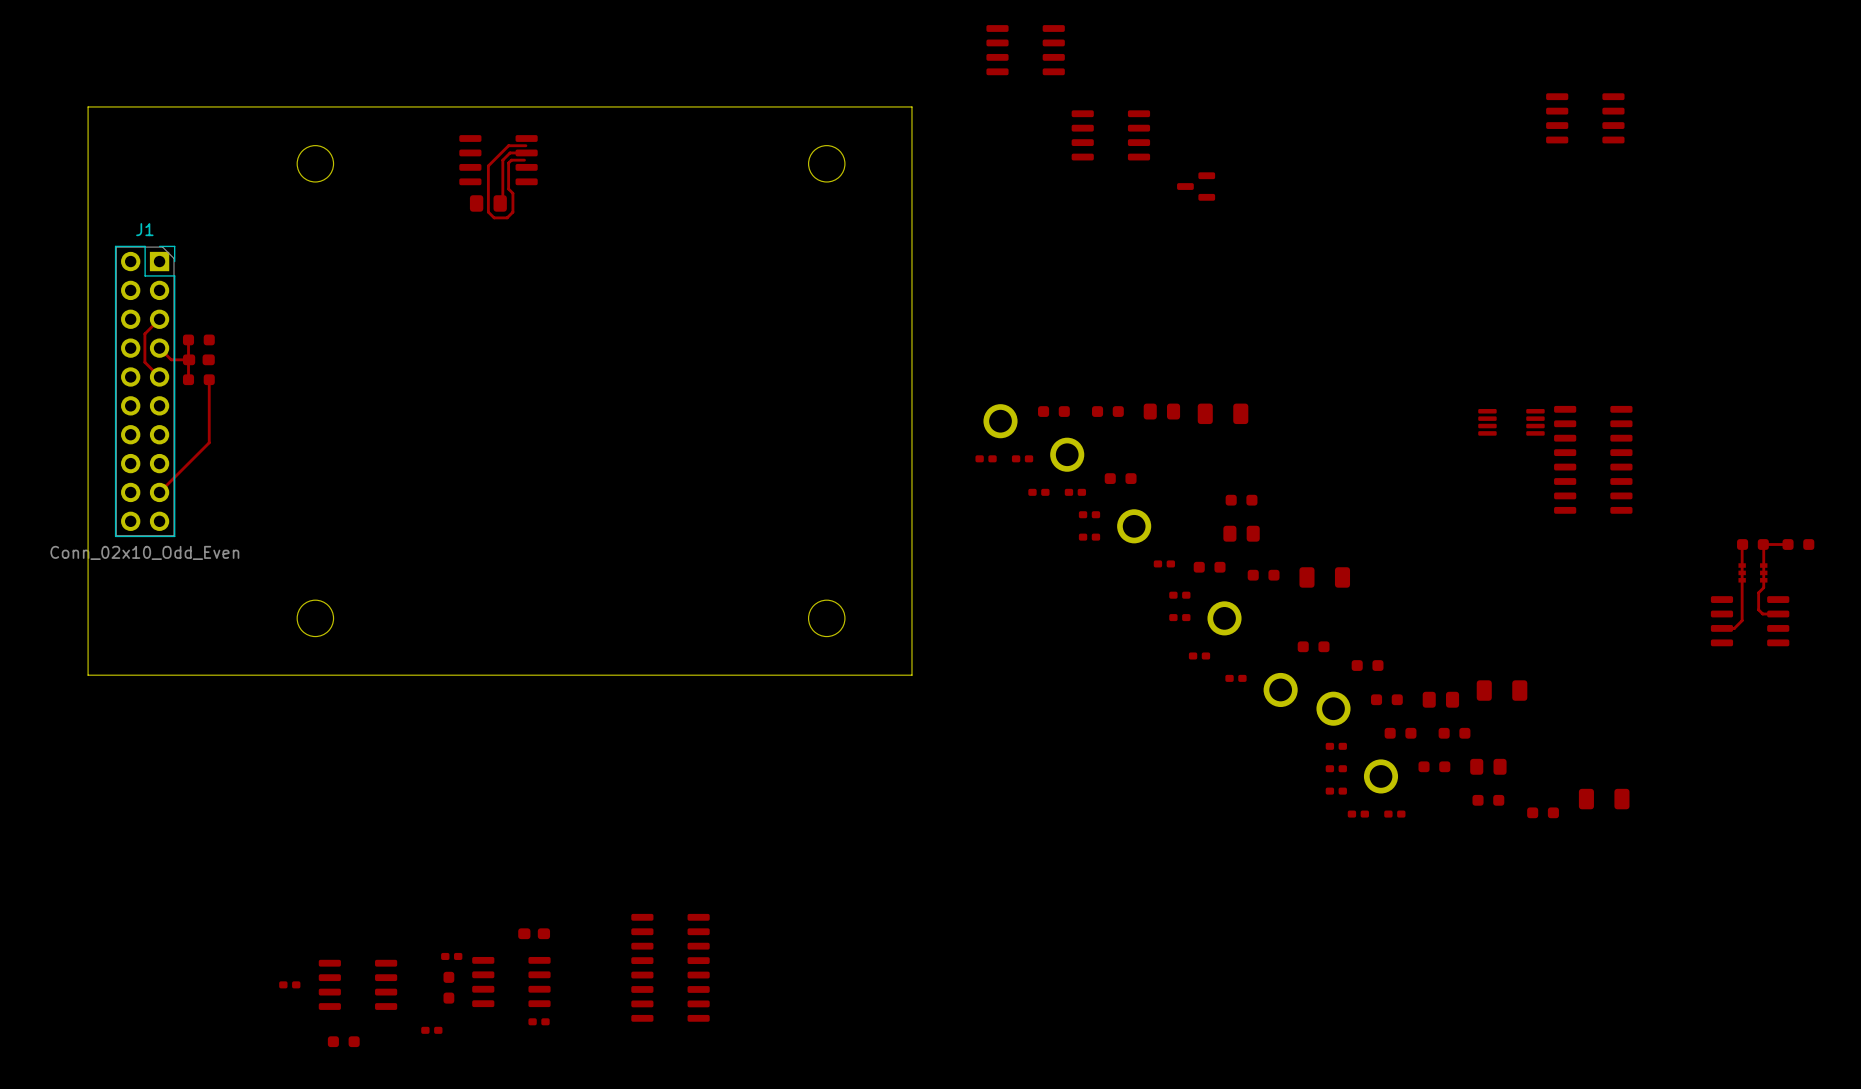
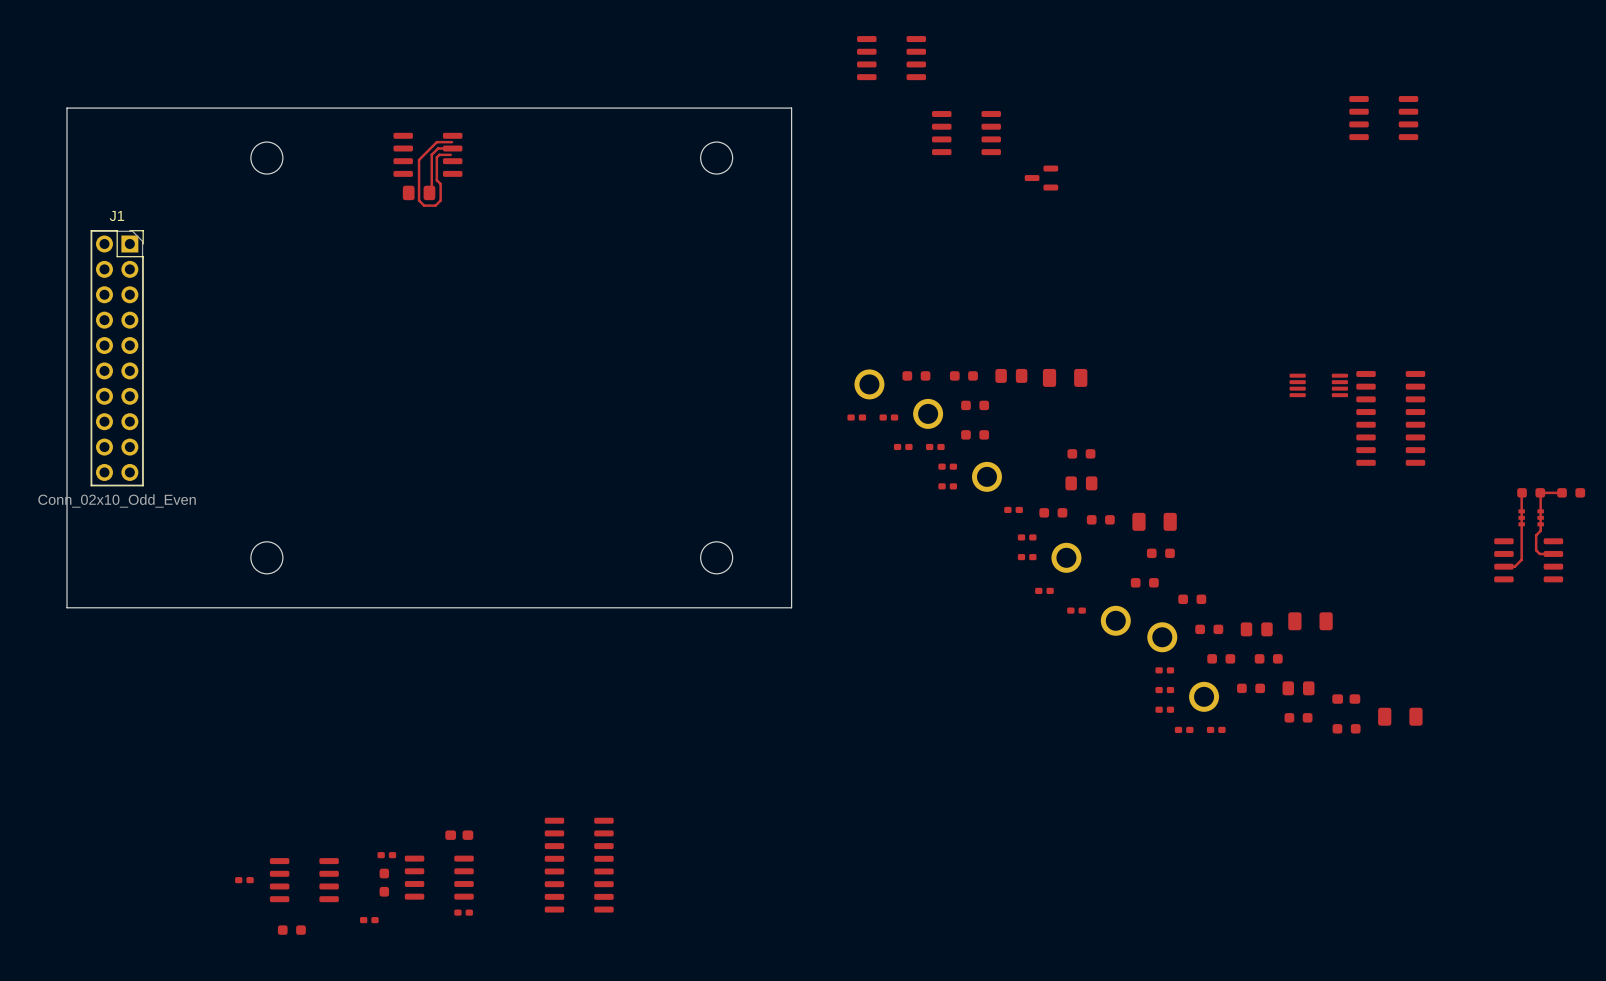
top track: (159, 319) (144, 333) (144, 362) (159, 376) -> none
top track: (188, 339) (189, 359) -> none
part: (198, 339) -> none
top track: (159, 348) (171, 359) (189, 359) -> none
top track: (189, 359) (188, 379) -> none
part: (198, 359) -> none
part: (198, 379) -> none
top track: (209, 379) (209, 442) (159, 492) -> none
part: none -> (975, 405)
part: none -> (1160, 553)
part: none -> (1346, 699)

